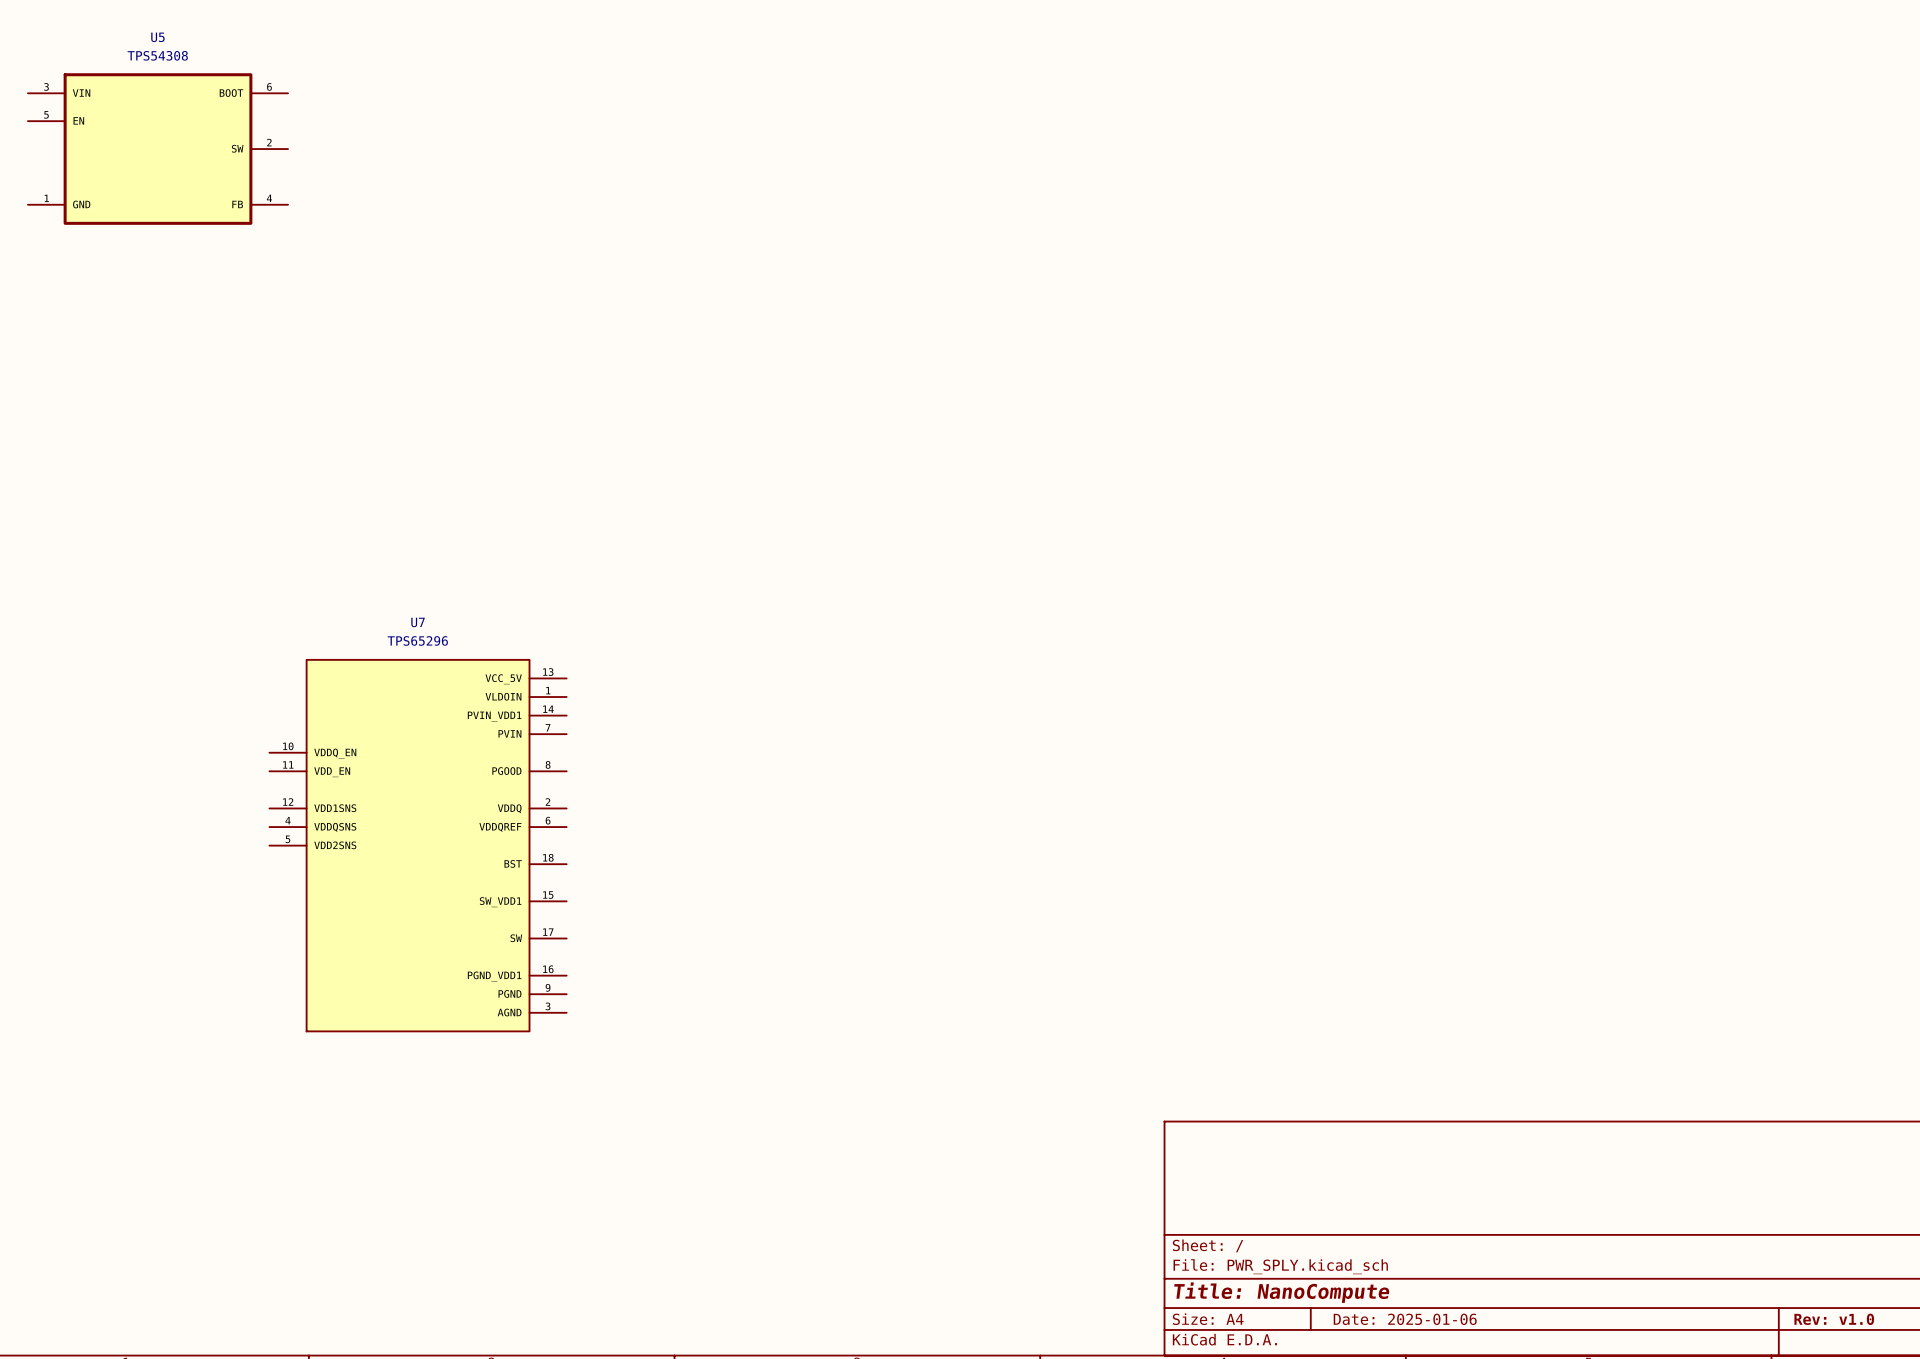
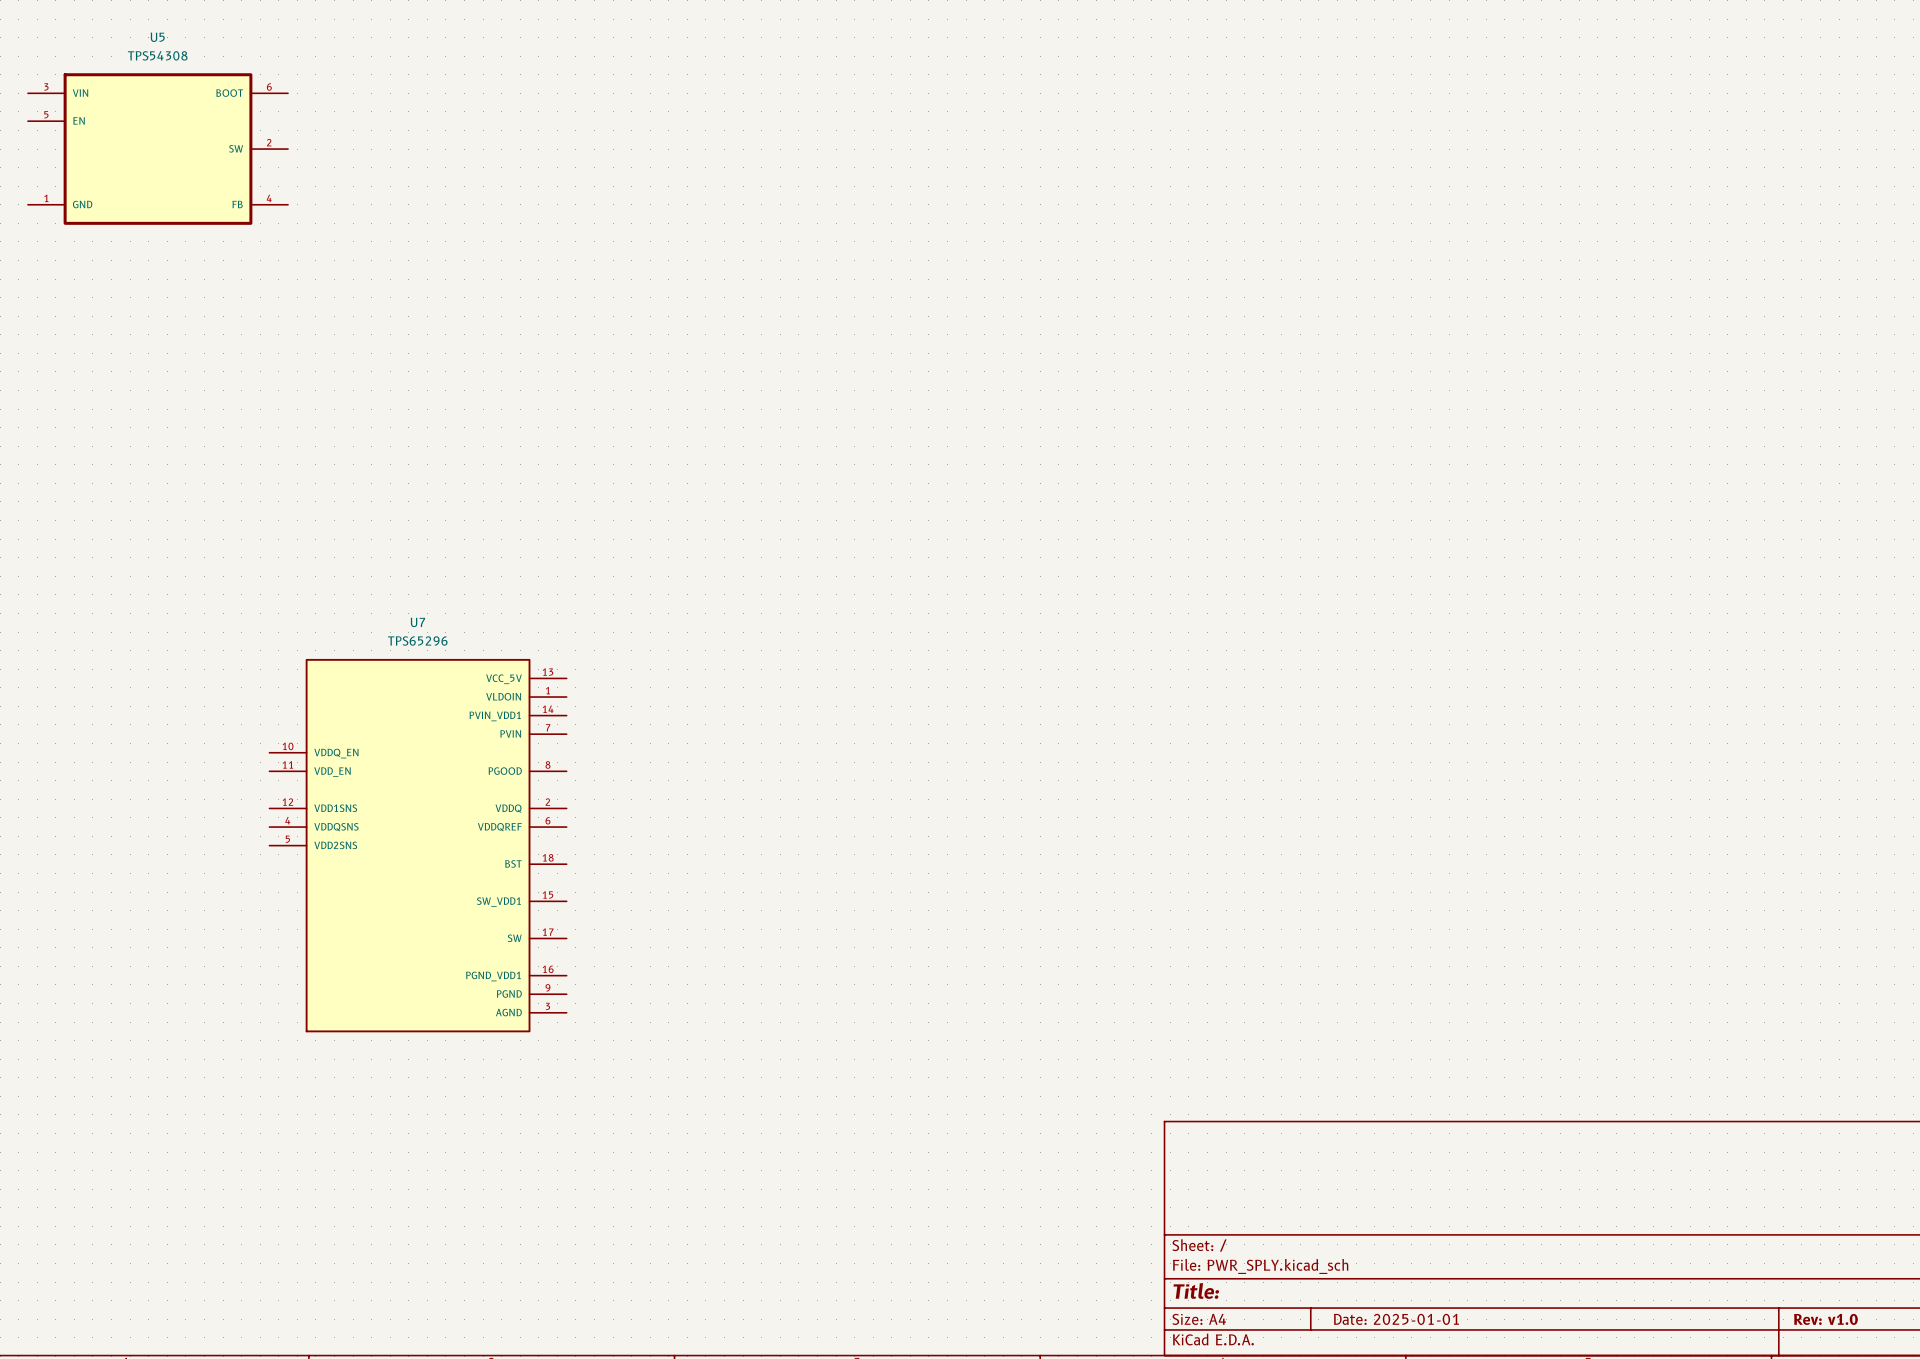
title block: Title: NanoCompute (1281, 1292) -> Title: (1196, 1290)
title block: Date: 2025-01-06 (1405, 1319) -> Date: 2025-01-01 (1396, 1319)

